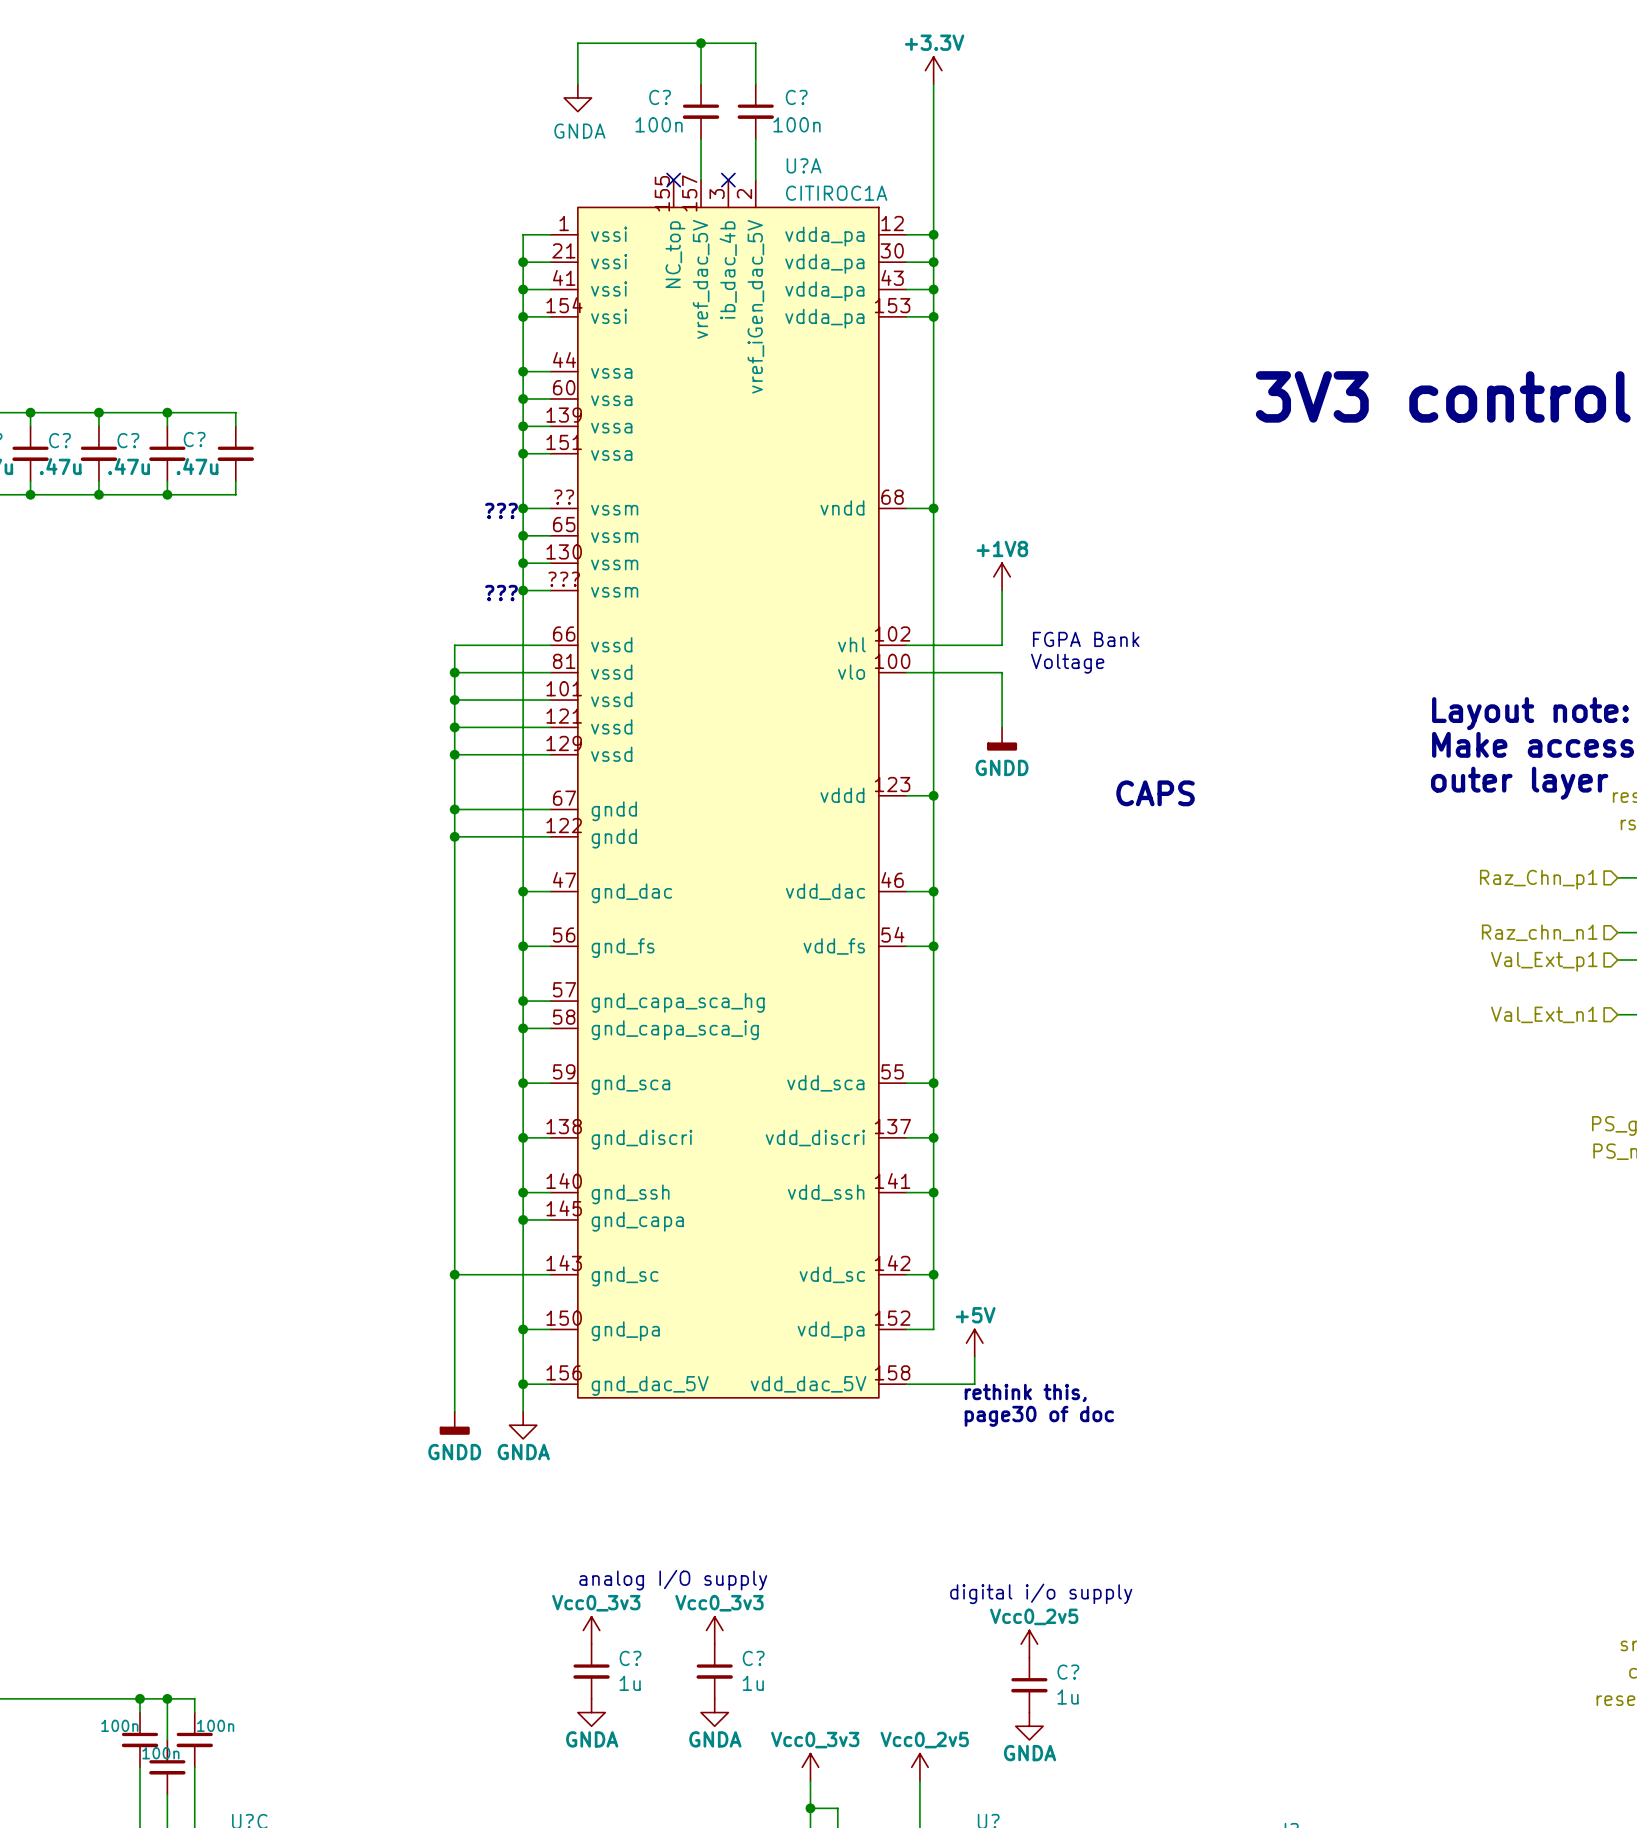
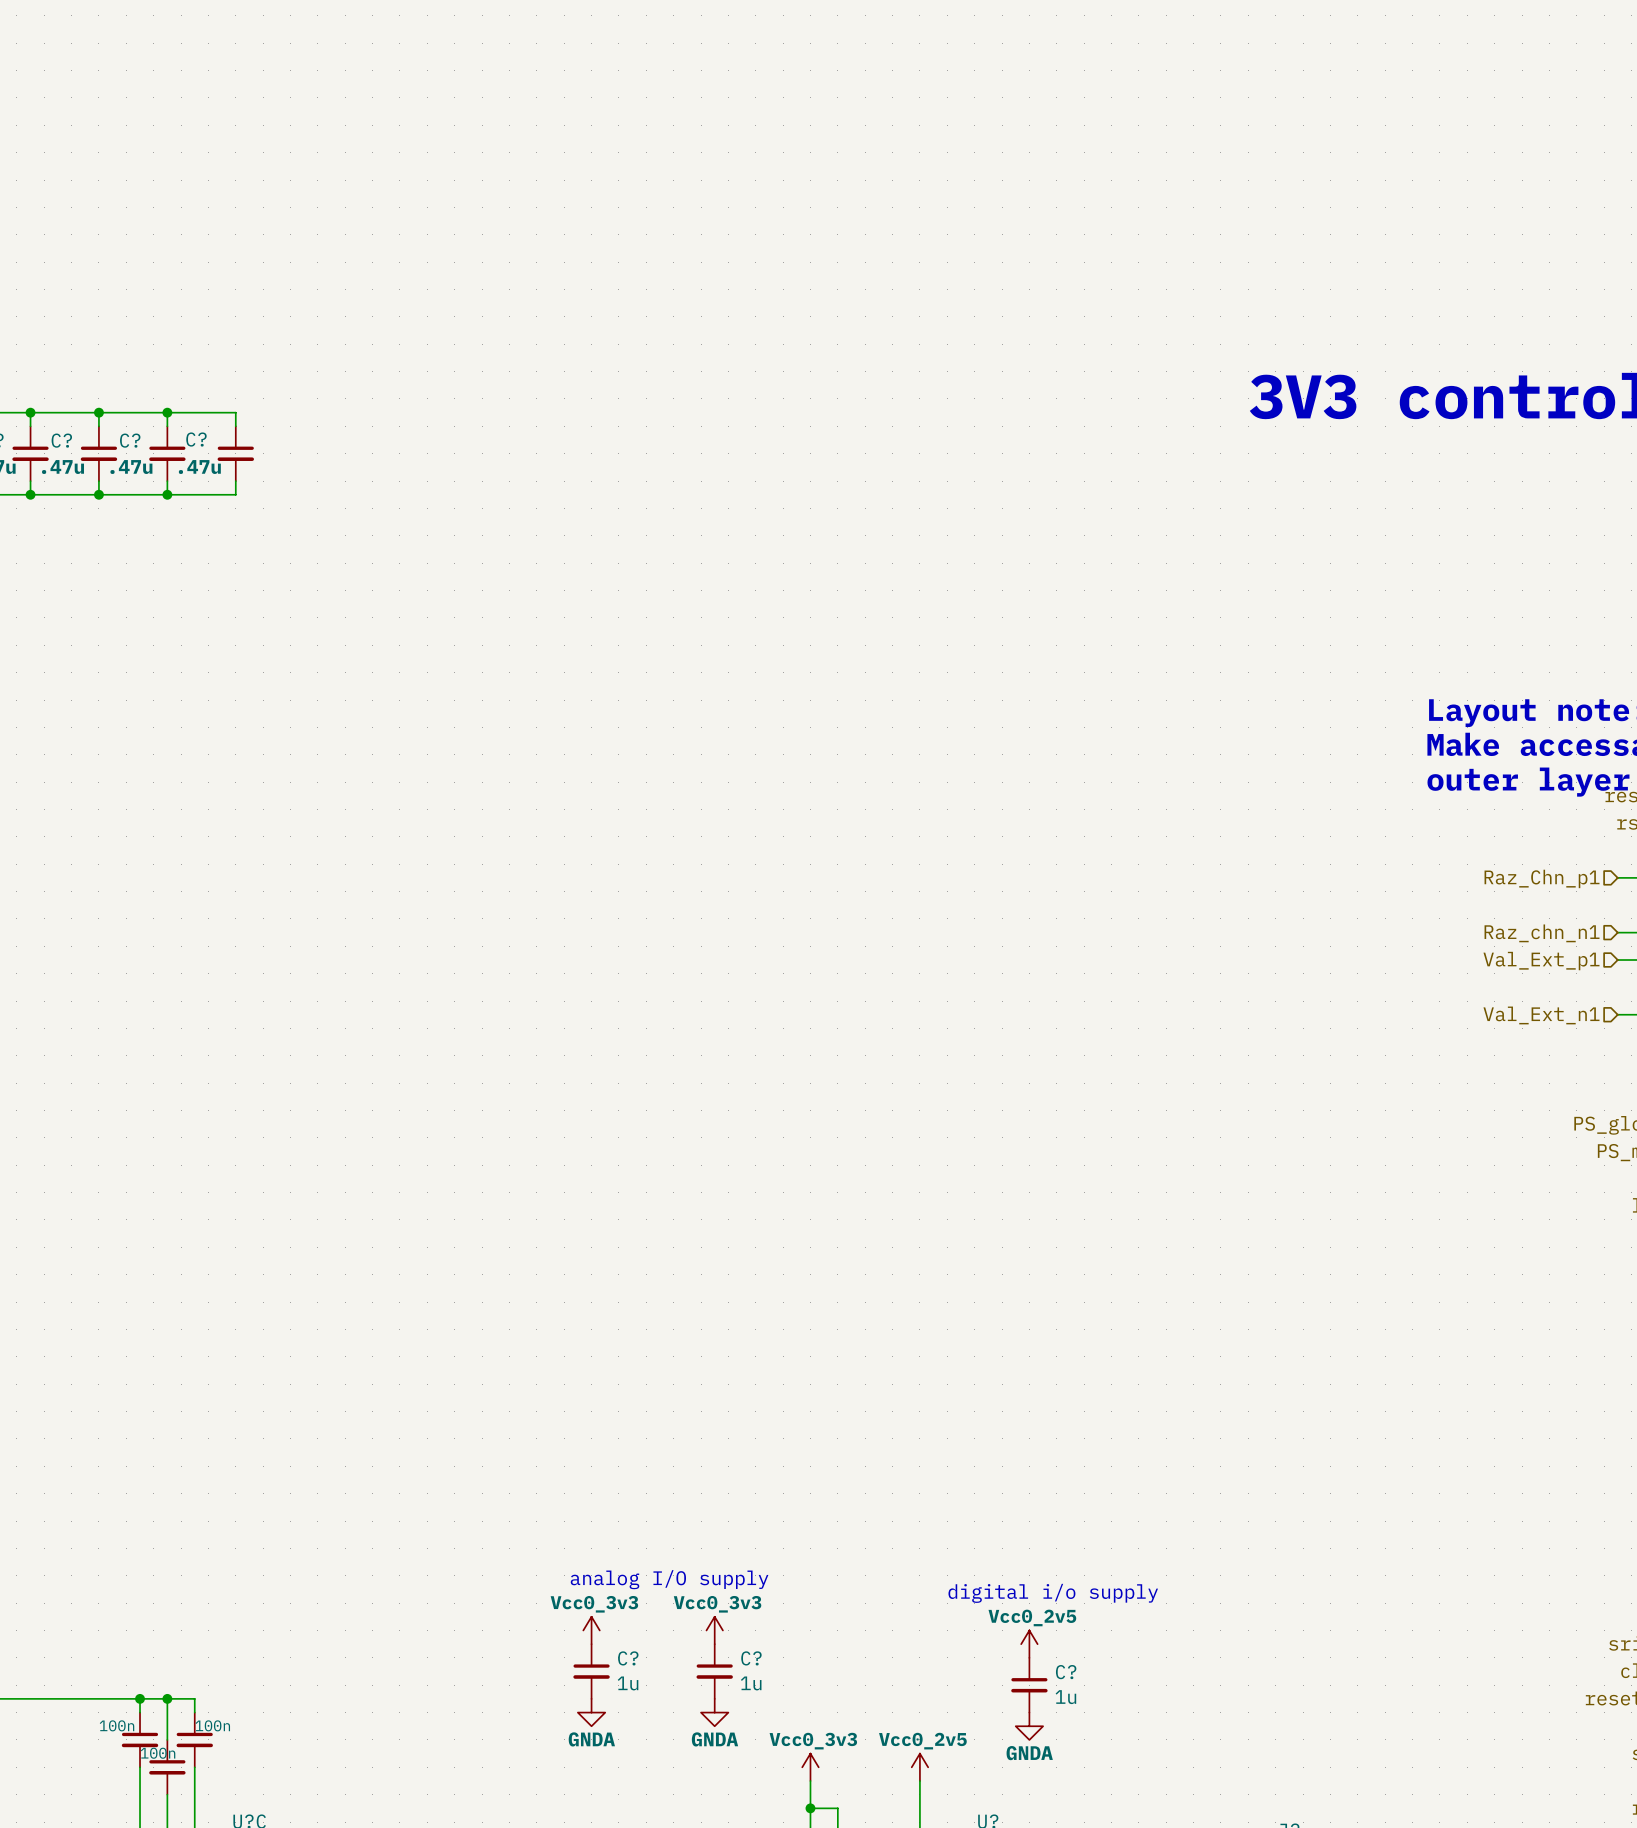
wire: (701, 43) (701, 84) -> none
junction: (701, 43) -> none
power symbol: +3.3V (933, 70) -> none
wire: (577, 84) (577, 43) (755, 43) (755, 84) -> none
wire: (933, 84) (933, 1329) (906, 1329) -> none
power symbol: GNDA (577, 97) -> none
C?: 100n (701, 111) -> none
C?: 100n (755, 111) -> none
wire: (701, 139) (701, 180) -> none
wire: (755, 139) (755, 180) -> none
no-connect mark: (673, 180) -> none
no-connect mark: (728, 180) -> none
wire: (550, 234) (523, 234) (523, 1411) -> none
wire: (906, 234) (933, 234) -> none
junction: (933, 234) -> none
wire: (523, 262) (550, 262) -> none
junction: (523, 262) -> none
wire: (906, 262) (933, 262) -> none
junction: (933, 262) -> none
wire: (523, 289) (550, 289) -> none
junction: (523, 289) -> none
wire: (906, 289) (933, 289) -> none
junction: (933, 289) -> none
wire: (523, 316) (550, 316) -> none
junction: (523, 316) -> none
wire: (906, 316) (933, 316) -> none
junction: (933, 316) -> none
wire: (523, 371) (550, 371) -> none
junction: (523, 371) -> none
wire: (523, 398) (550, 398) -> none
junction: (523, 398) -> none
wire: (523, 426) (550, 426) -> none
junction: (523, 426) -> none
wire: (523, 453) (550, 453) -> none
junction: (523, 453) -> none
wire: (523, 508) (550, 508) -> none
junction: (523, 508) -> none
wire: (906, 508) (933, 508) -> none
junction: (933, 508) -> none
text: ??? (501, 510) -> none
wire: (523, 535) (550, 535) -> none
junction: (523, 535) -> none
wire: (523, 563) (550, 563) -> none
junction: (523, 563) -> none
power symbol: +1V8 (1002, 576) -> none
wire: (523, 590) (550, 590) -> none
junction: (523, 590) -> none
wire: (1002, 590) (1002, 645) (906, 645) -> none
text: ??? (501, 593) -> none
text: FGPA Bank (1086, 639) -> none
wire: (550, 645) (454, 645) (454, 1411) -> none
text: Voltage (1067, 663) -> none
wire: (454, 672) (550, 672) -> none
junction: (454, 672) -> none
wire: (906, 672) (1002, 672) (1002, 727) -> none
wire: (454, 700) (550, 700) -> none
junction: (454, 700) -> none
wire: (454, 727) (550, 727) -> none
junction: (454, 727) -> none
power symbol: GNDD (1002, 739) -> none
wire: (454, 754) (550, 754) -> none
junction: (454, 754) -> none
U?A: CITIROC1A (728, 788) -> none
text: CAPS (1155, 793) -> none
wire: (906, 795) (933, 795) -> none
junction: (933, 795) -> none
wire: (454, 809) (550, 809) -> none
junction: (454, 809) -> none
wire: (454, 836) (550, 836) -> none
junction: (454, 836) -> none
wire: (523, 891) (550, 891) -> none
junction: (523, 891) -> none
wire: (906, 891) (933, 891) -> none
junction: (933, 891) -> none
wire: (523, 946) (550, 946) -> none
junction: (523, 946) -> none
wire: (906, 946) (933, 946) -> none
junction: (933, 946) -> none
wire: (523, 1001) (550, 1001) -> none
junction: (523, 1001) -> none
wire: (523, 1028) (550, 1028) -> none
junction: (523, 1028) -> none
wire: (523, 1083) (550, 1083) -> none
junction: (523, 1083) -> none
wire: (906, 1083) (933, 1083) -> none
junction: (933, 1083) -> none
wire: (523, 1137) (550, 1137) -> none
junction: (523, 1137) -> none
wire: (906, 1137) (933, 1137) -> none
junction: (933, 1137) -> none
wire: (523, 1192) (550, 1192) -> none
junction: (523, 1192) -> none
wire: (906, 1192) (933, 1192) -> none
junction: (933, 1192) -> none
wire: (523, 1219) (550, 1219) -> none
junction: (523, 1219) -> none
wire: (454, 1274) (550, 1274) -> none
junction: (454, 1274) -> none
wire: (906, 1274) (933, 1274) -> none
junction: (933, 1274) -> none
wire: (523, 1329) (550, 1329) -> none
junction: (523, 1329) -> none
power symbol: +5V (974, 1343) -> none
wire: (974, 1356) (974, 1384) (906, 1384) -> none
wire: (523, 1384) (550, 1384) -> none
junction: (523, 1384) -> none
text: rethink this, (1025, 1392) -> none
text: page30 of doc (1039, 1416) -> none
power symbol: GNDD (454, 1423) -> none
power symbol: GNDA (523, 1425) -> none

